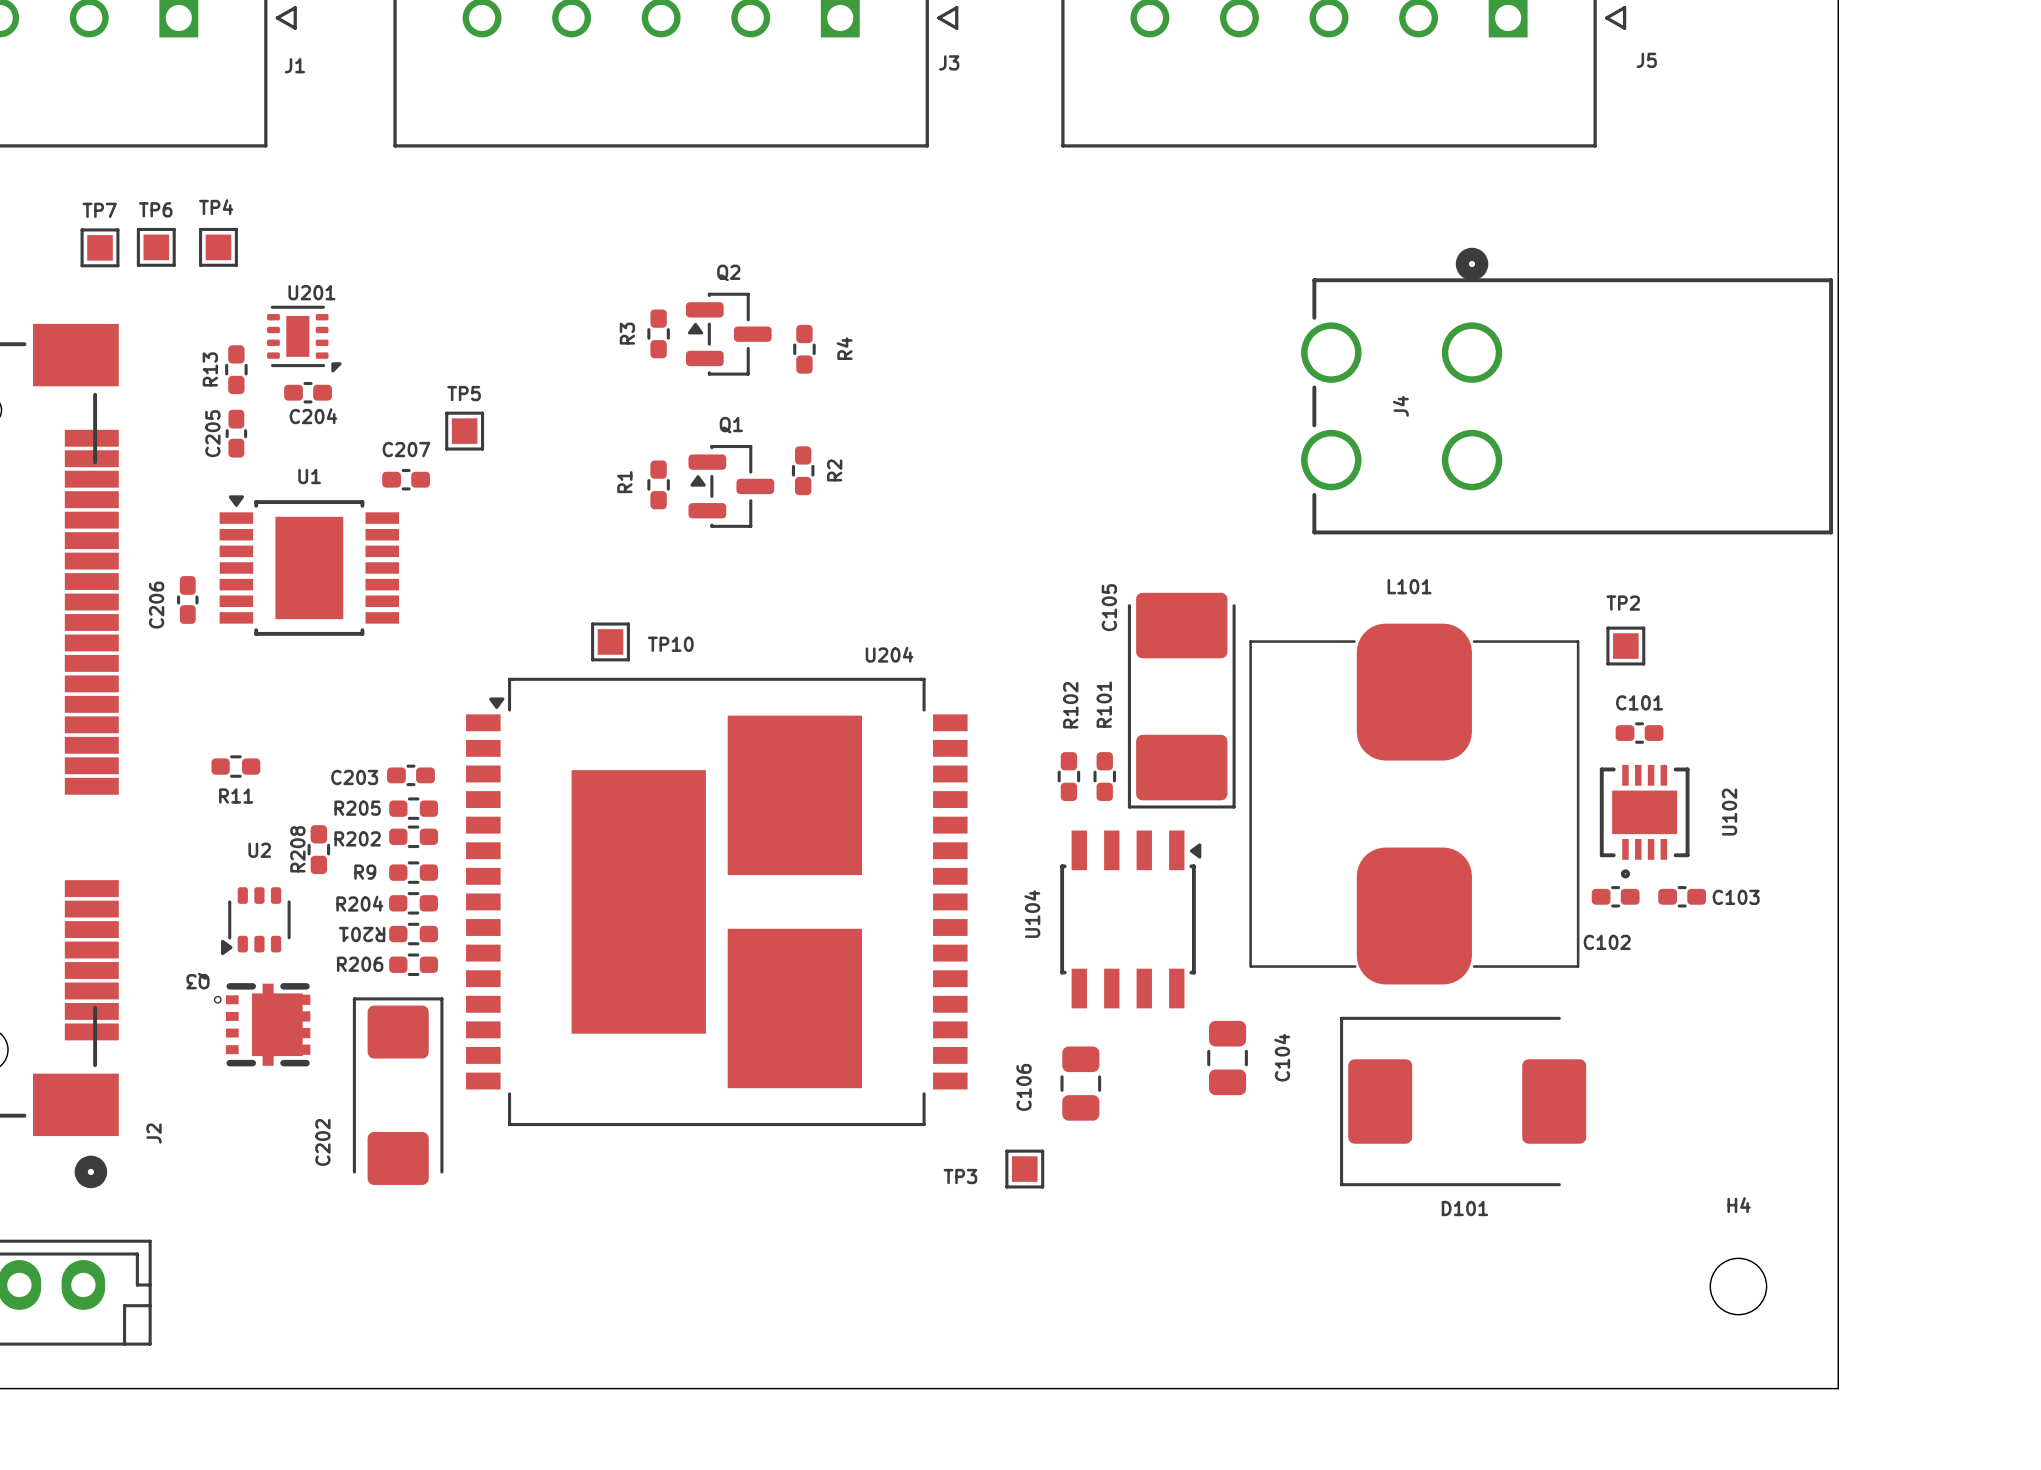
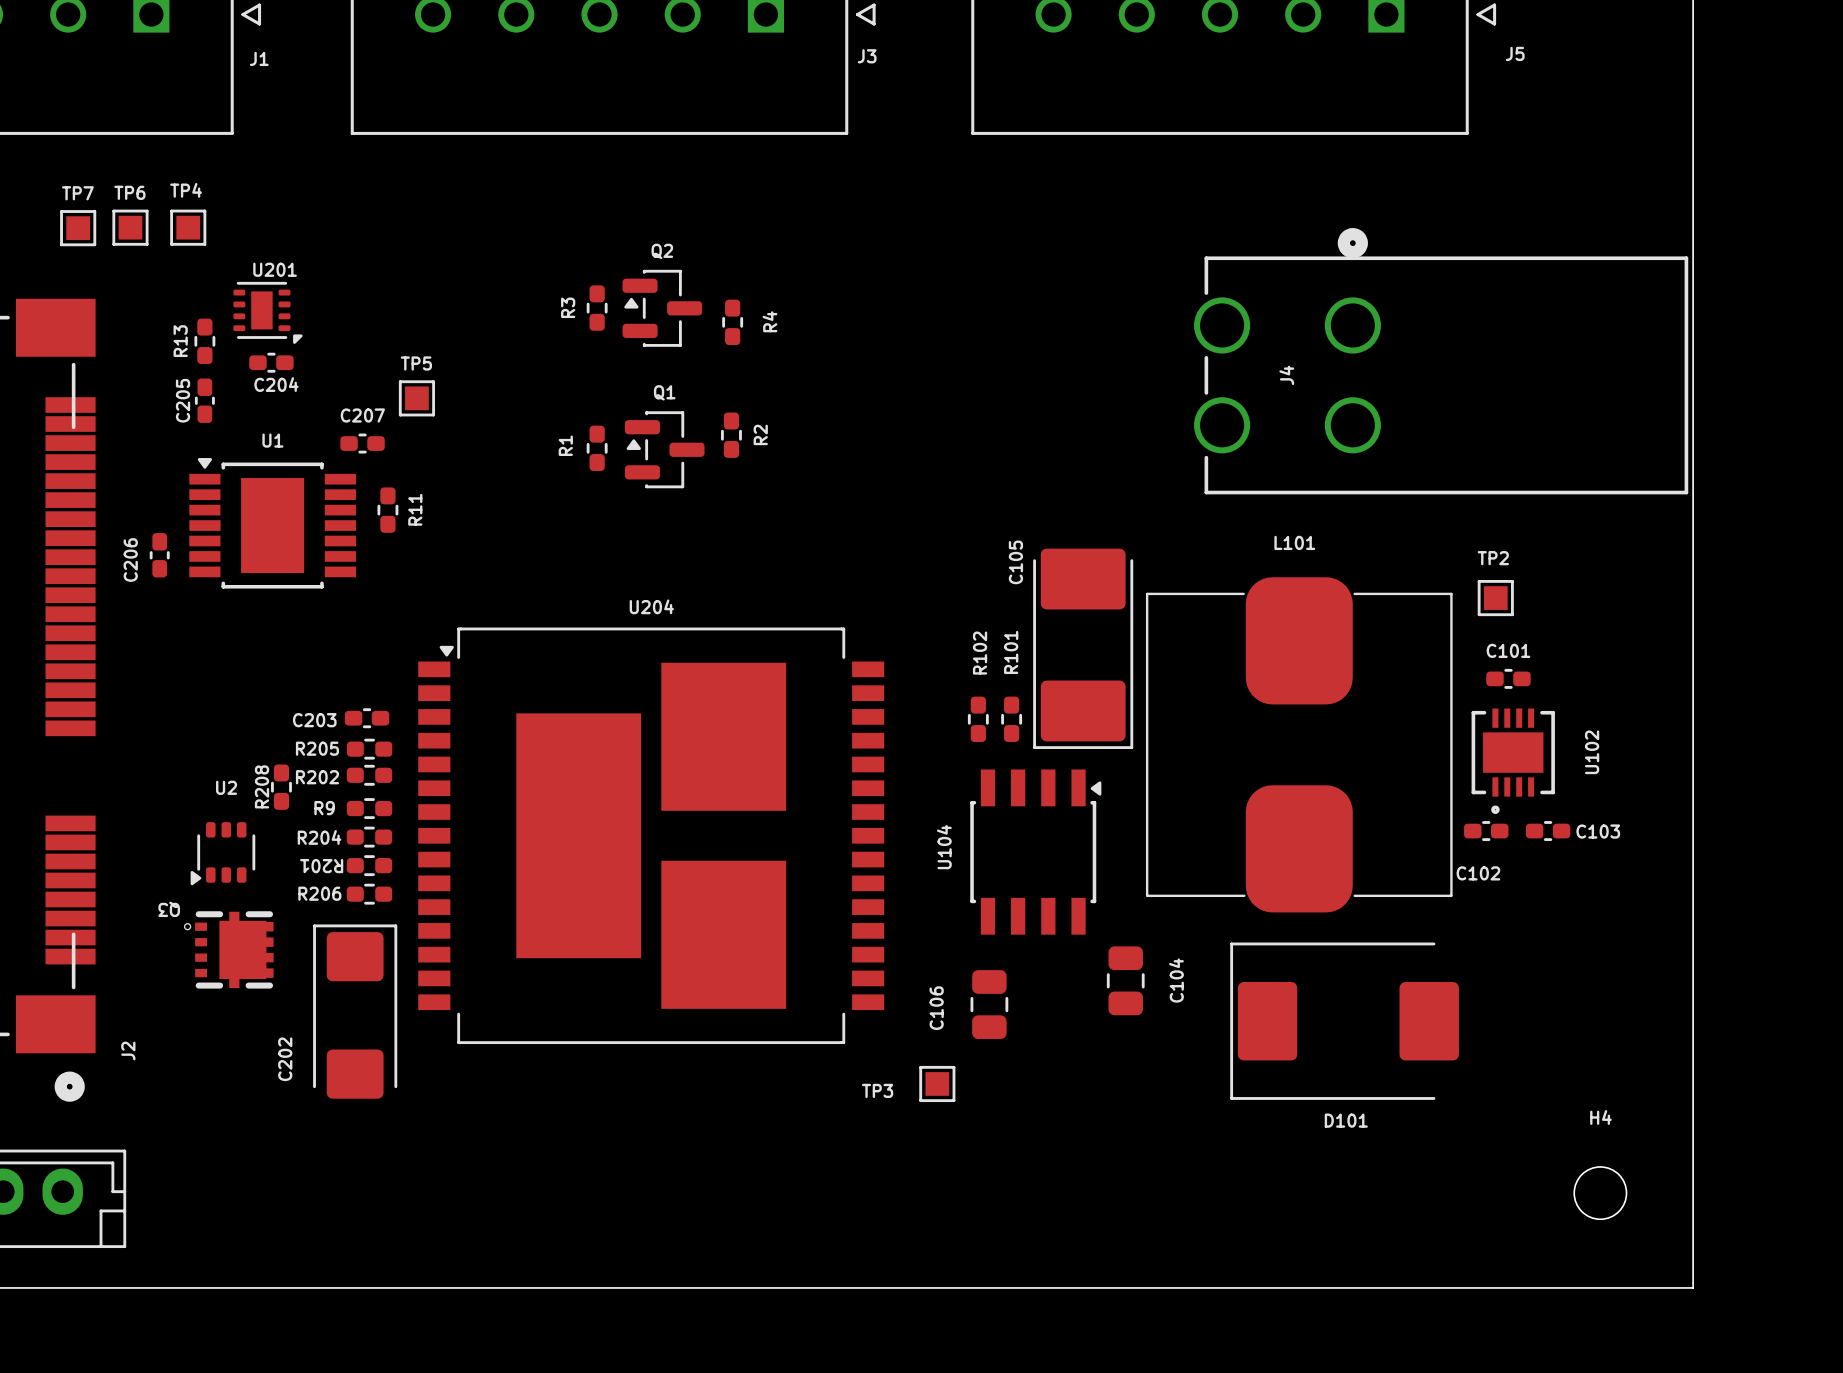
TP10: (610, 641) -> none
U204 name position: U204 (889, 654) -> U204 (651, 606)
R11 rotation: 0° (235, 766) -> 90° clockwise (387, 510)
R11 position: (235, 766) -> (387, 510)

